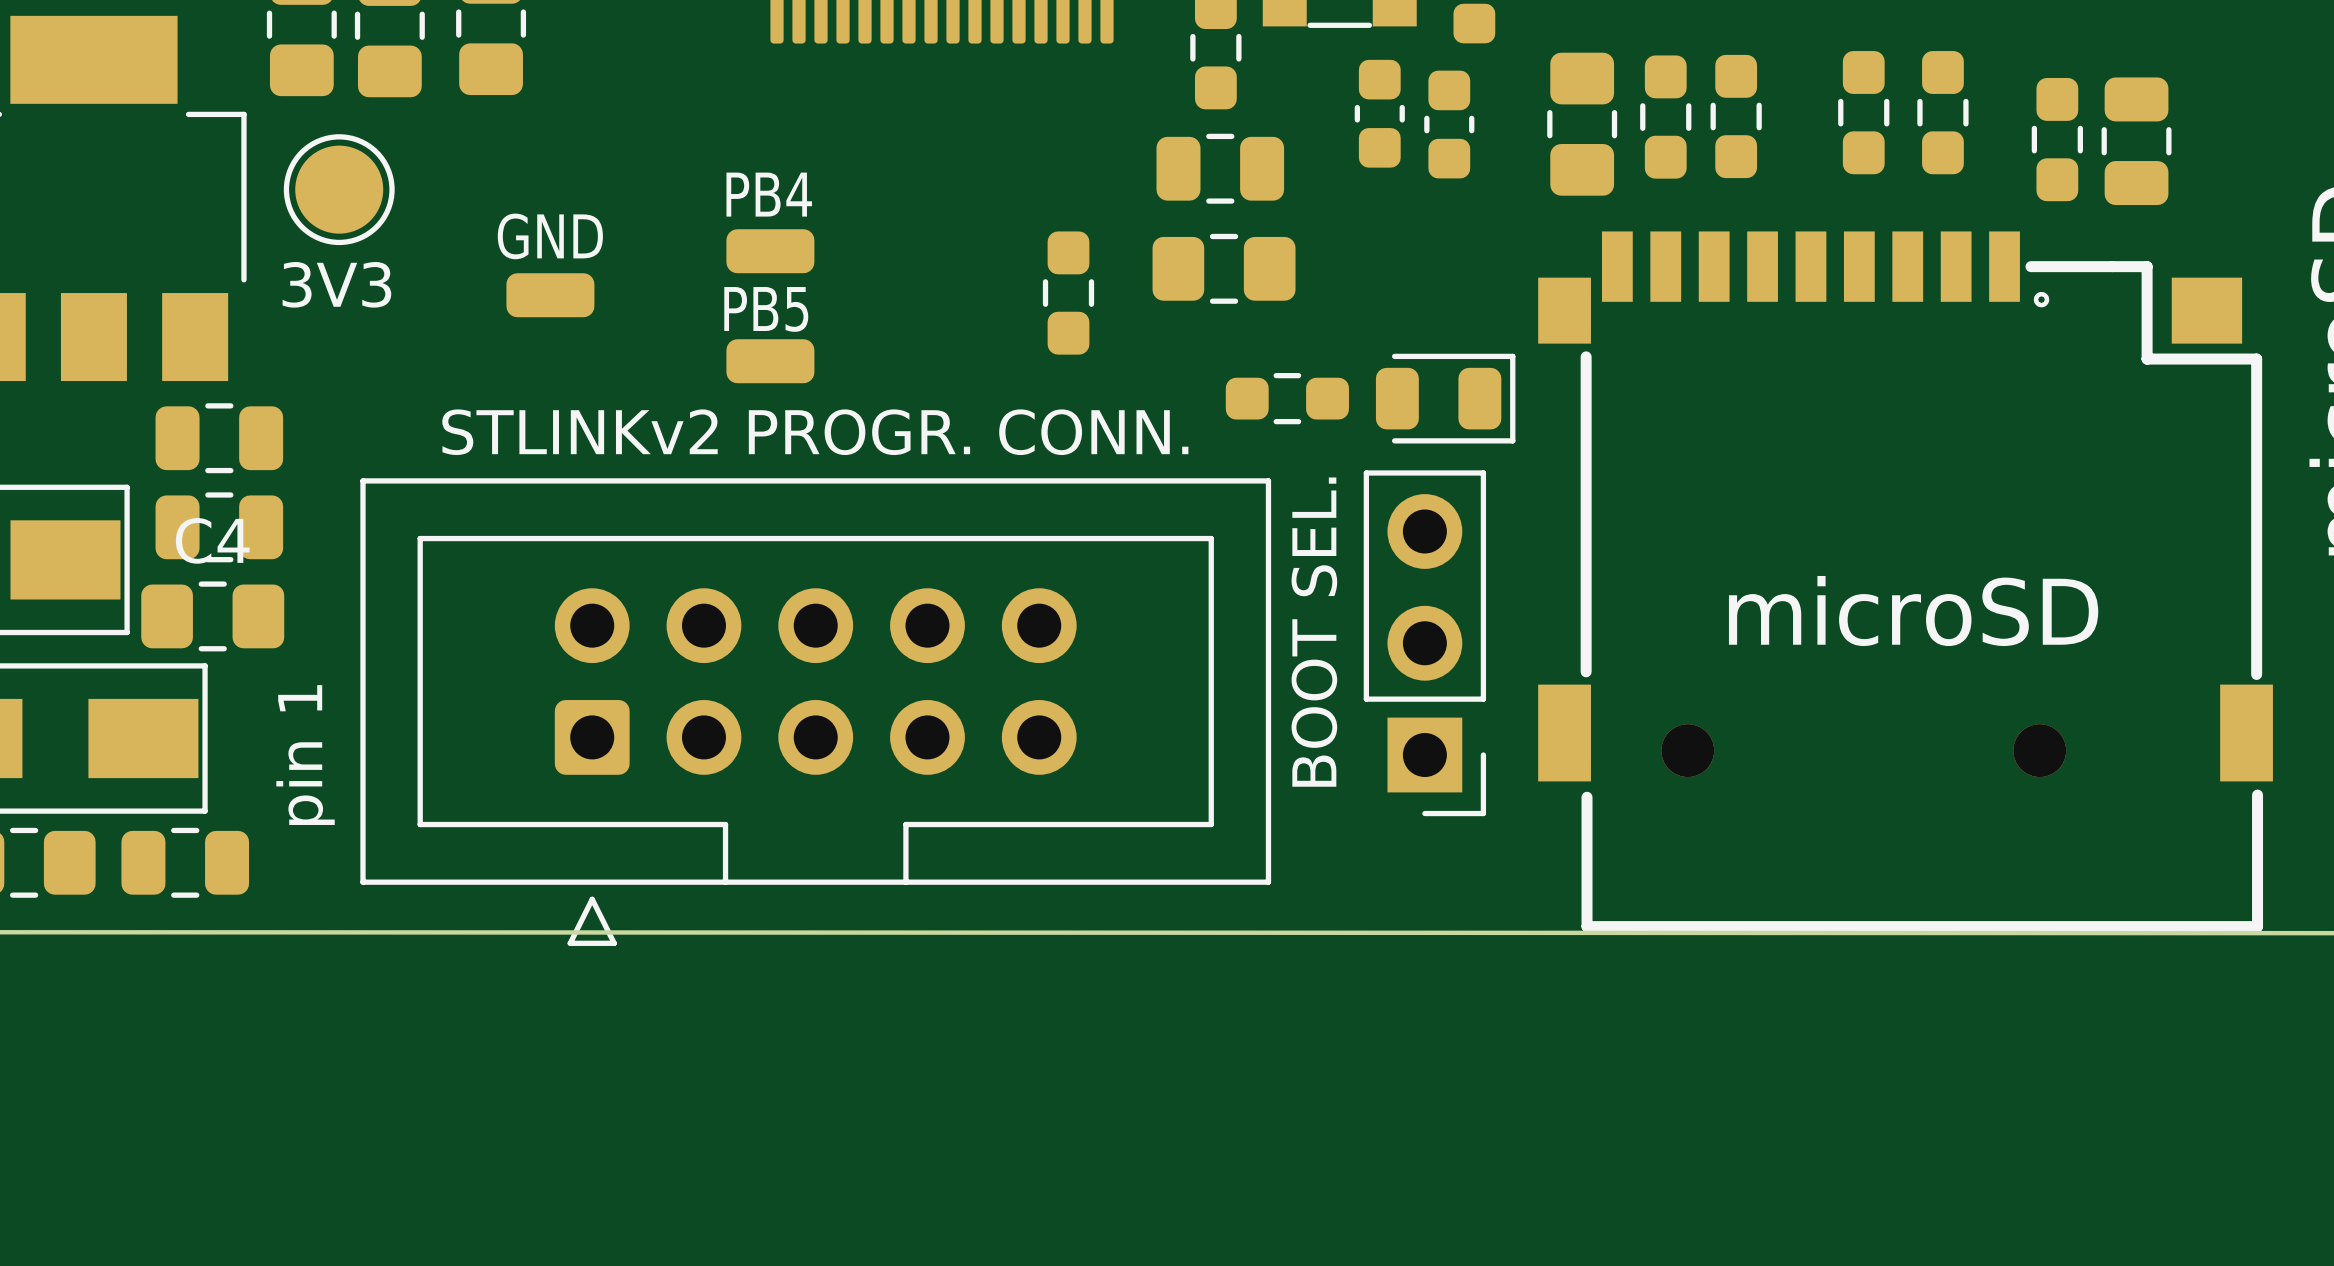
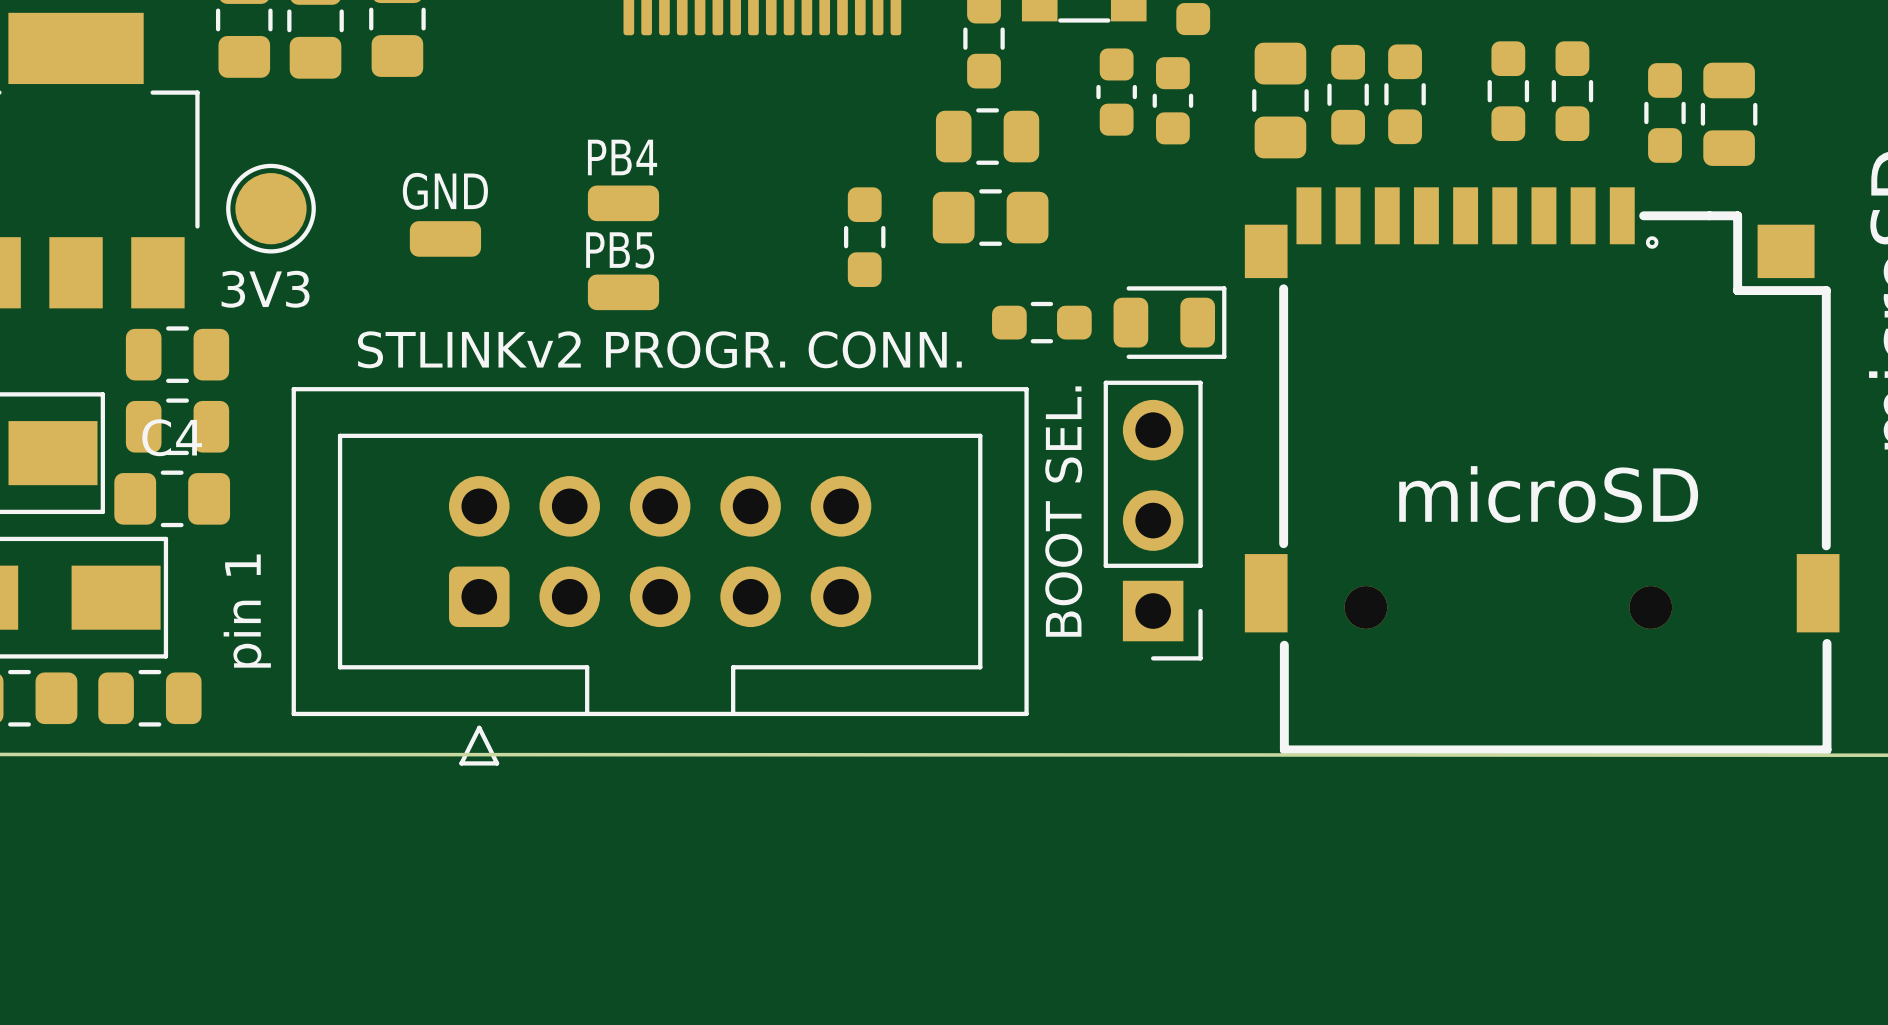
part position: (339, 189) -> (270, 208)
text position: 3V3 (336, 284) -> 3V3 (265, 289)

